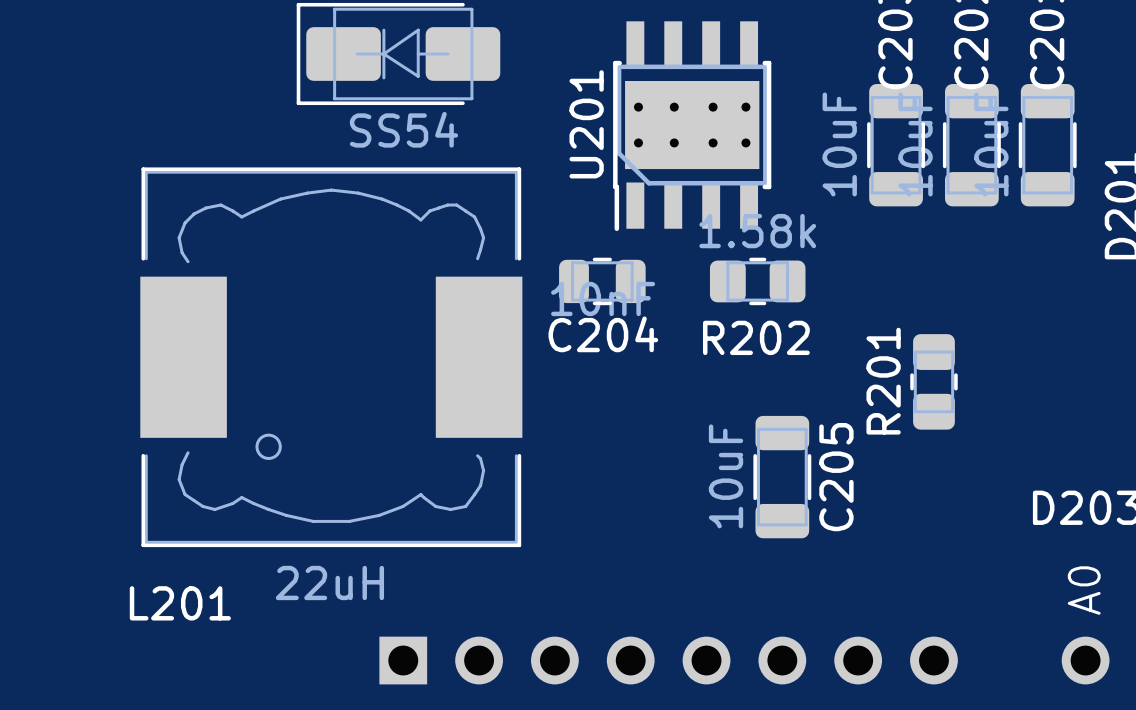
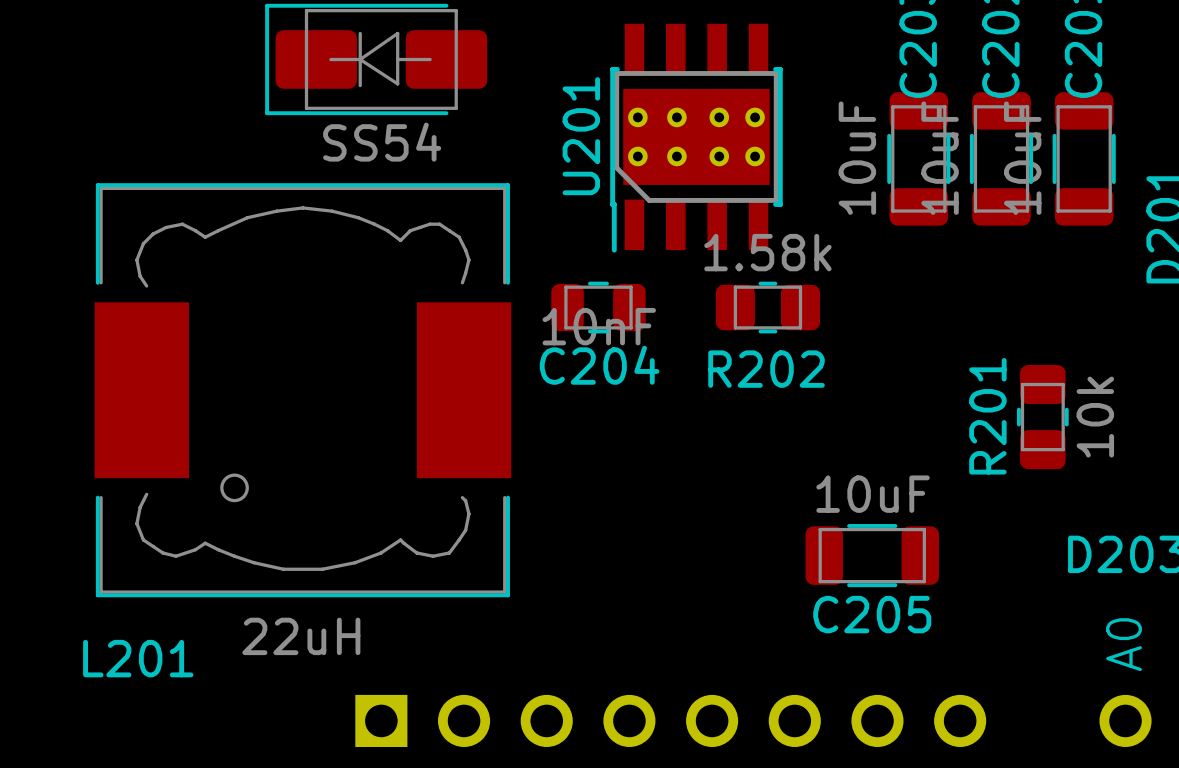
R201 position: (933, 381) -> (1042, 417)
R201 value: none -> 10k (1095, 417)
C205 rotation: 0° (782, 477) -> 90° clockwise (872, 555)
C205 position: (782, 477) -> (872, 555)

